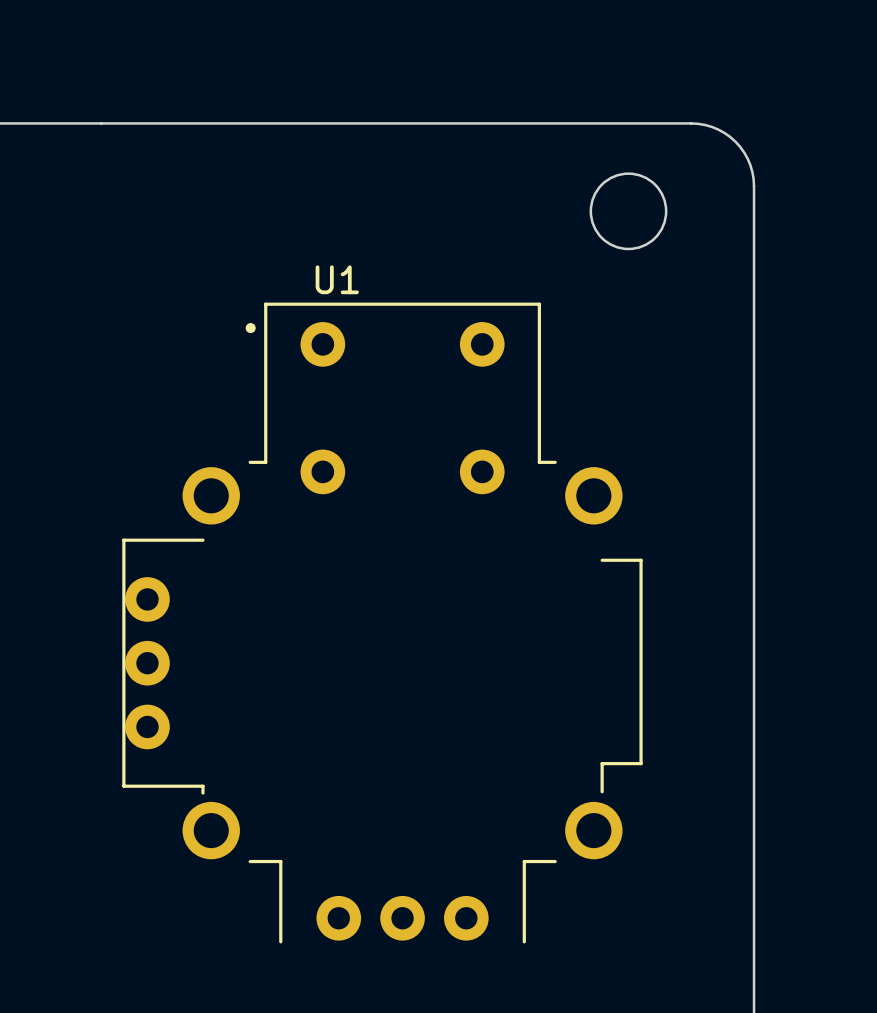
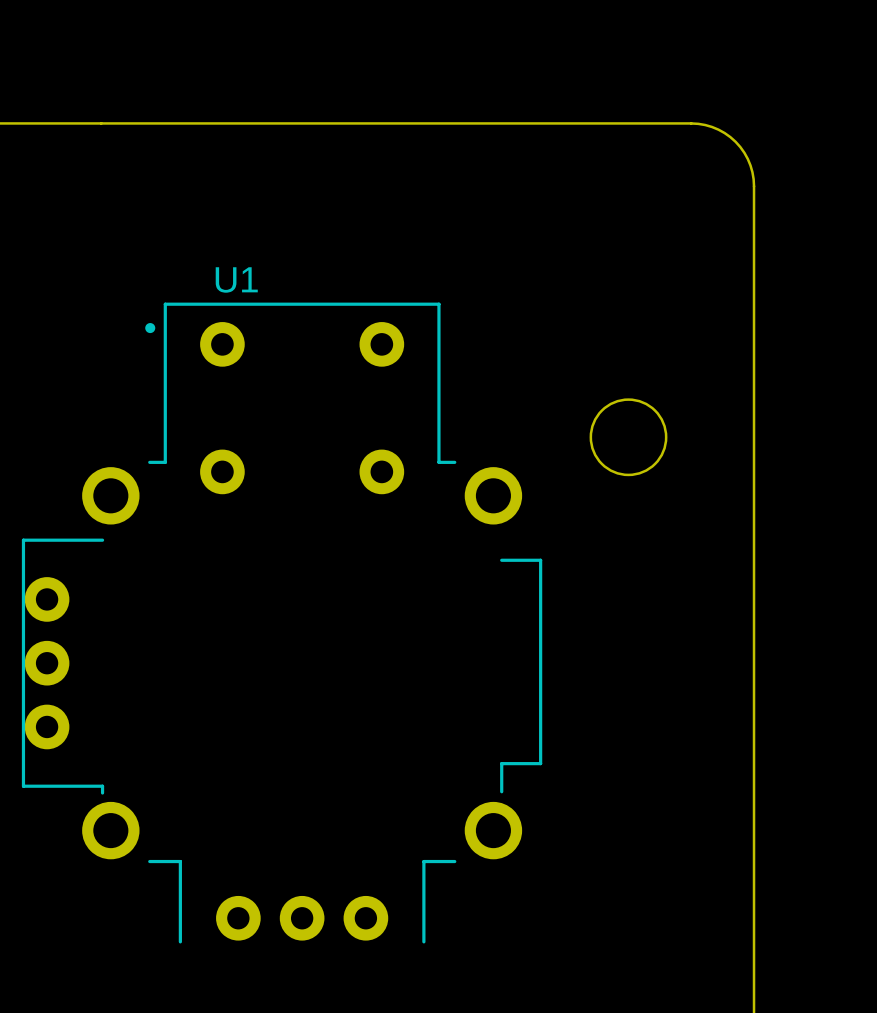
round board edge position: (628, 211) -> (628, 437)
U1 position: (382, 623) -> (282, 623)

